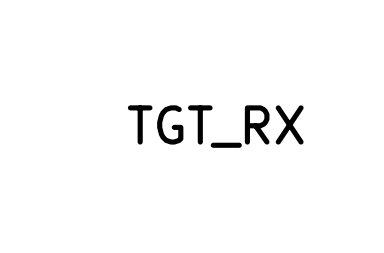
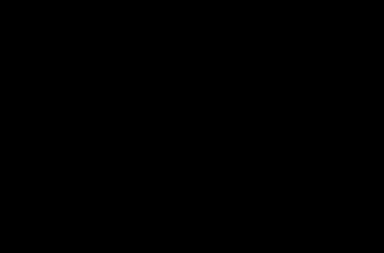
text: TGT_RX (215, 126) -> none

